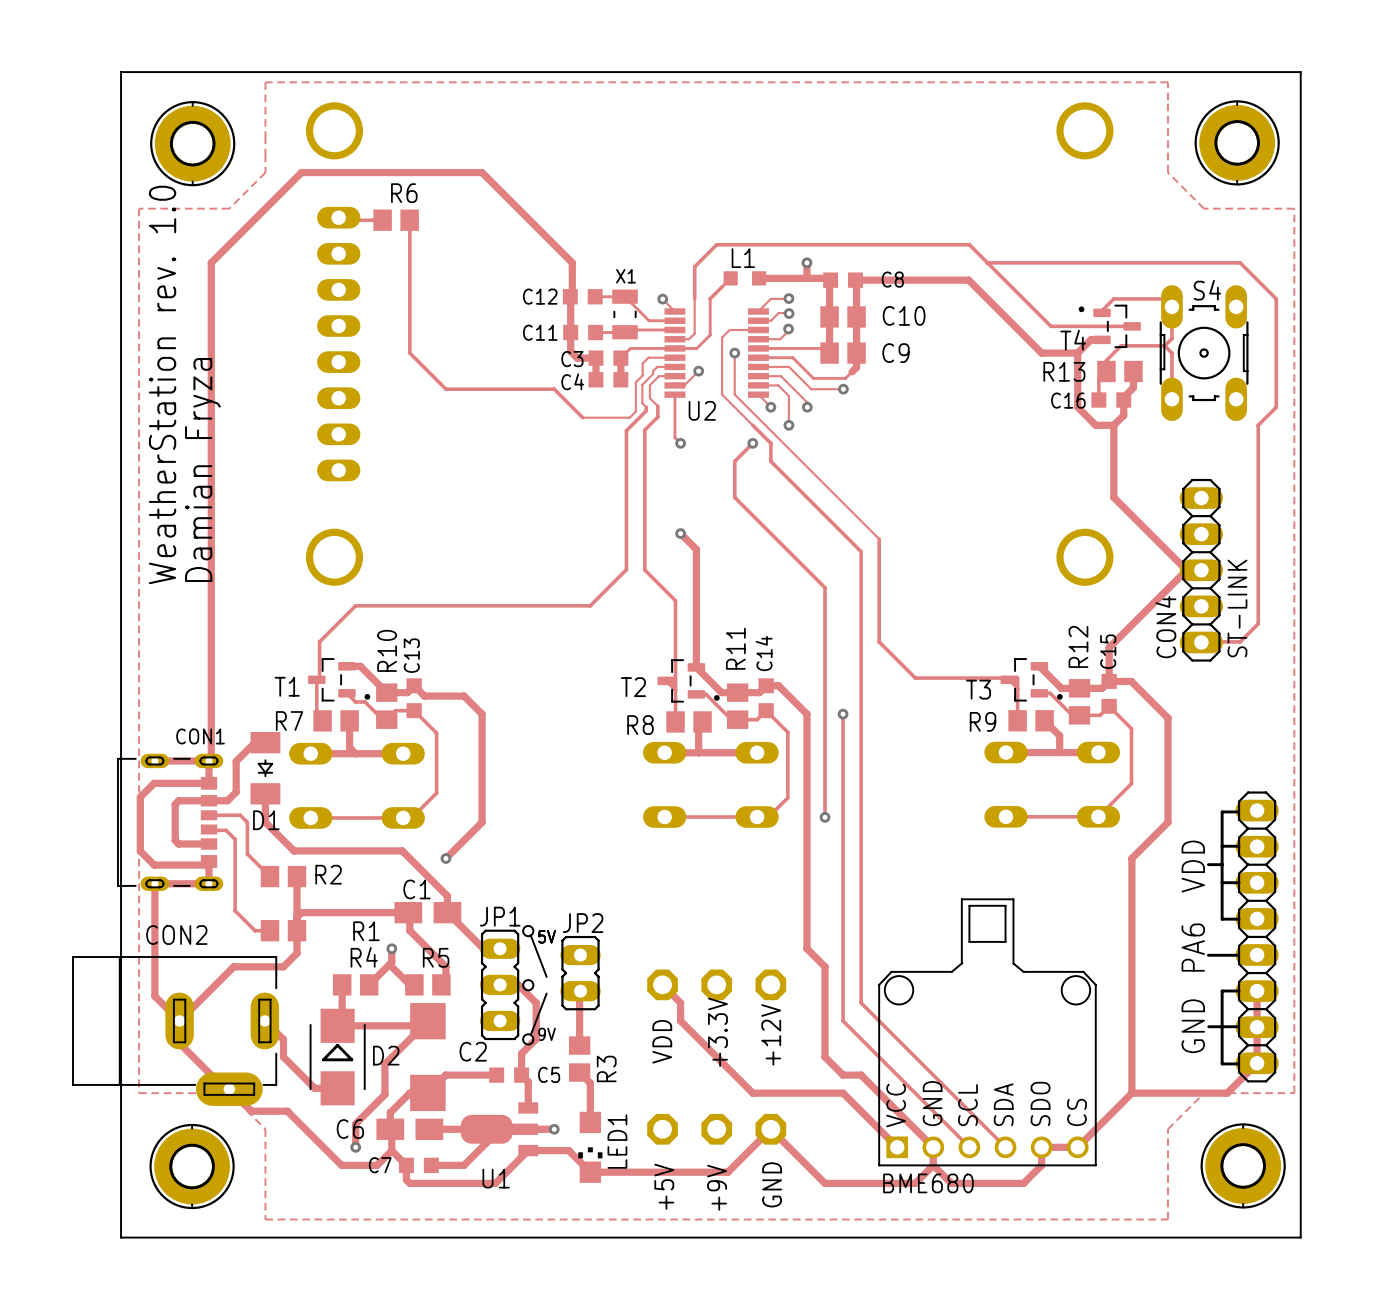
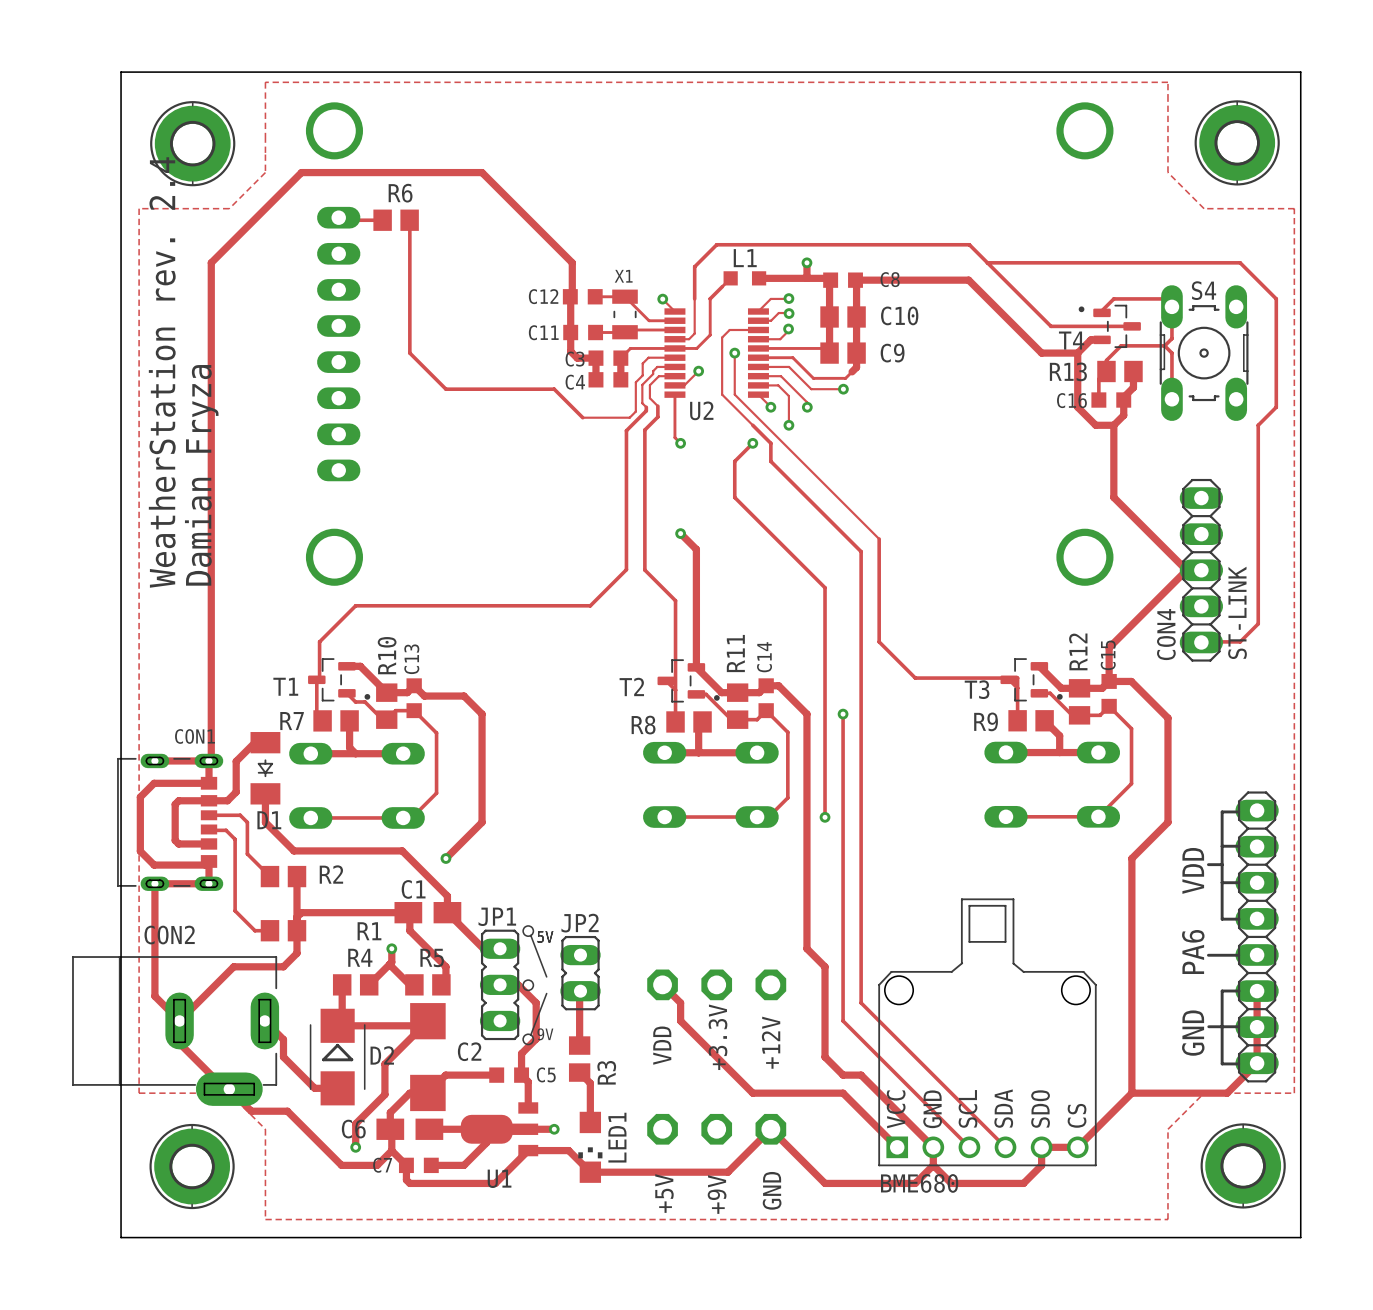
text: WeatherStation rev. 1.0 (162, 384) -> WeatherStation rev. 2.4 (162, 372)

